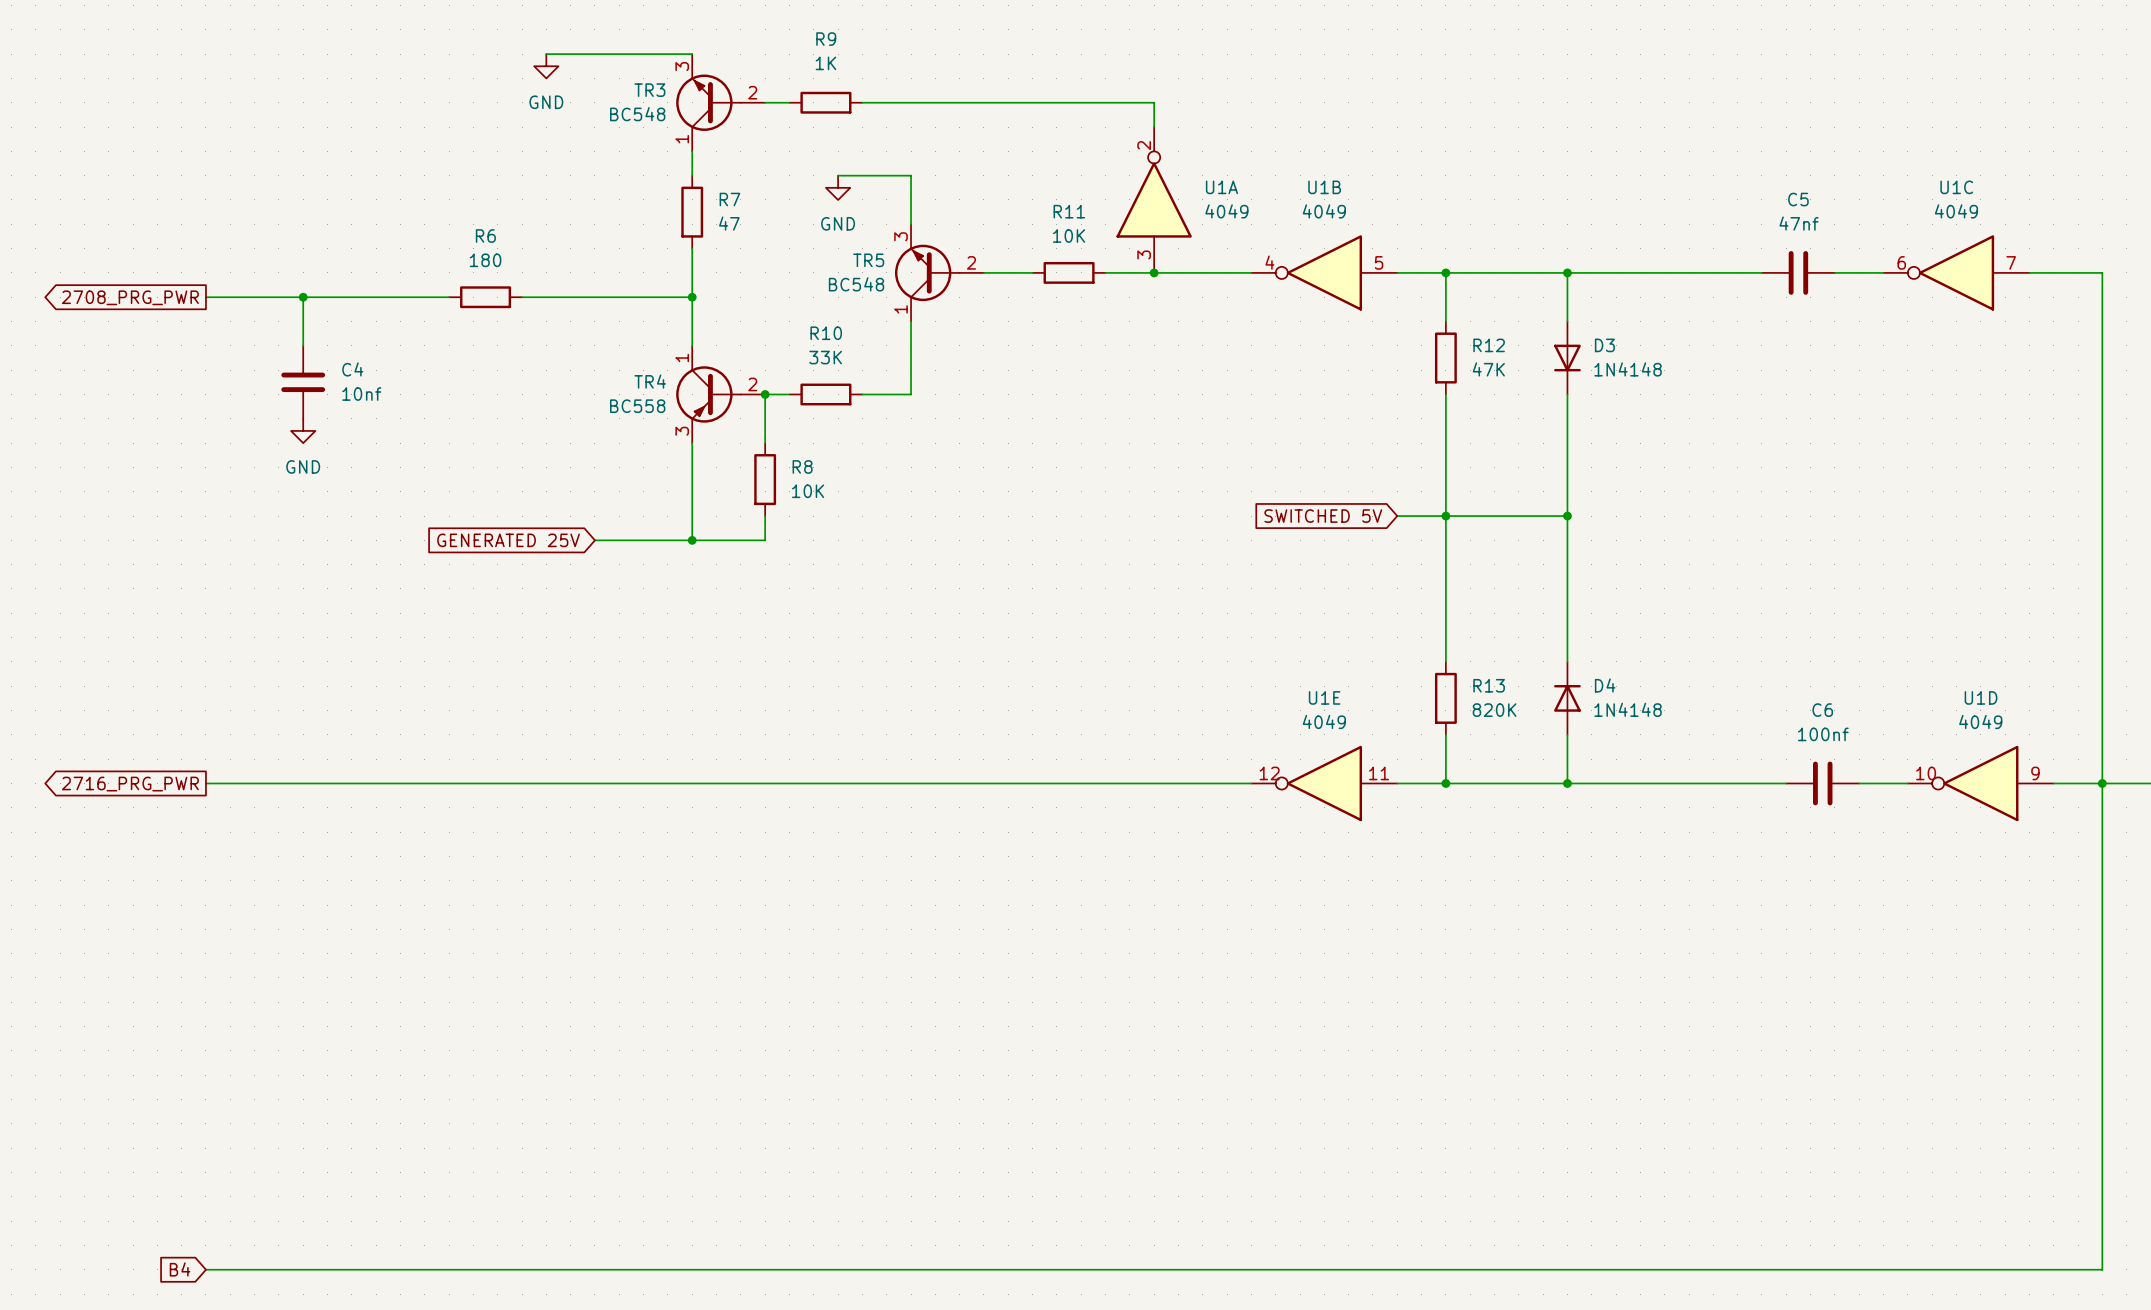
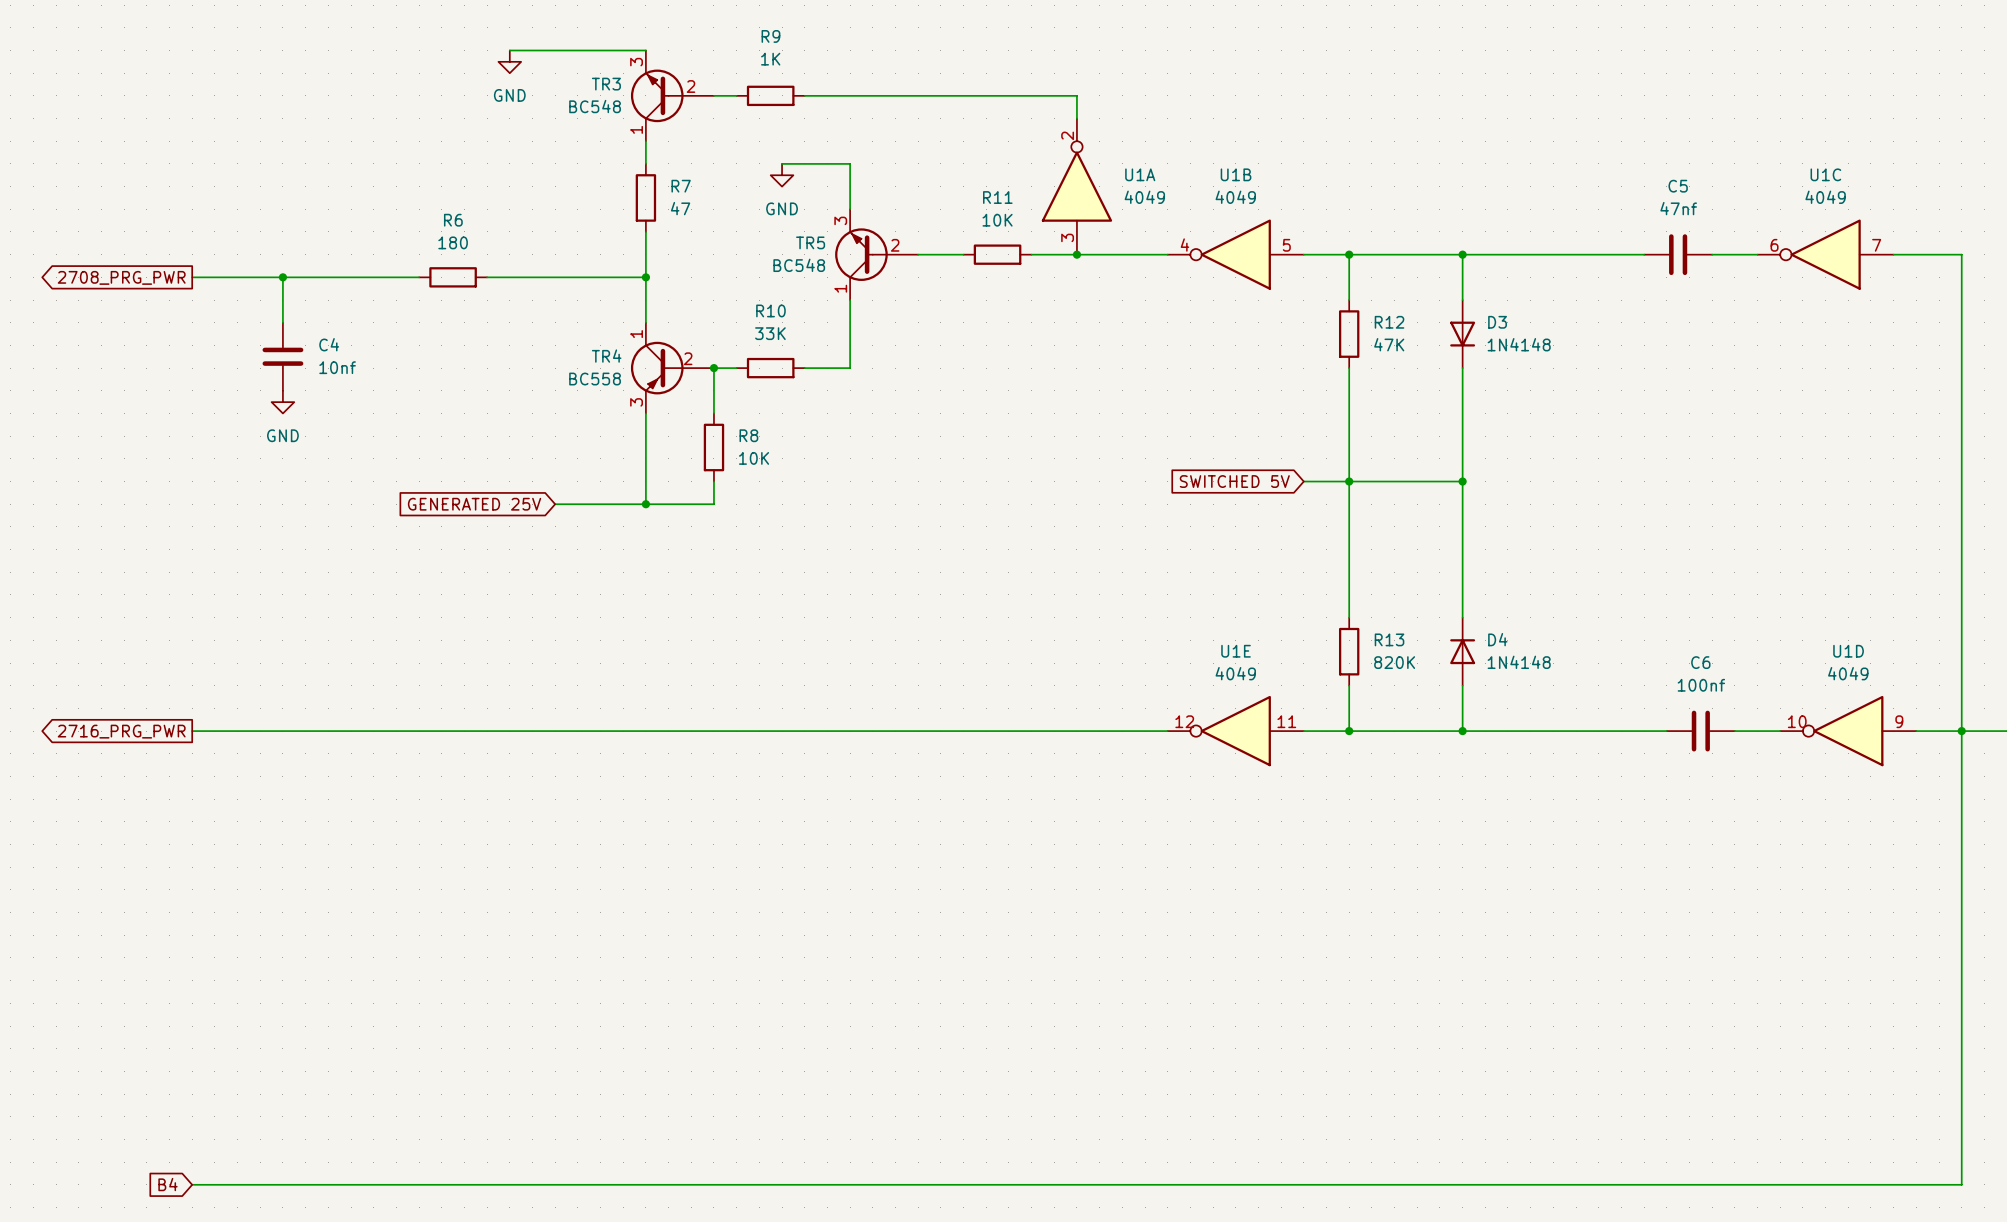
TR3 symbol: [676, 54, 766, 152] -> [630, 50, 714, 142]
TR5 symbol: [894, 224, 984, 322] -> [835, 209, 919, 301]
TR4 symbol: [676, 345, 766, 444] -> [630, 322, 714, 414]

